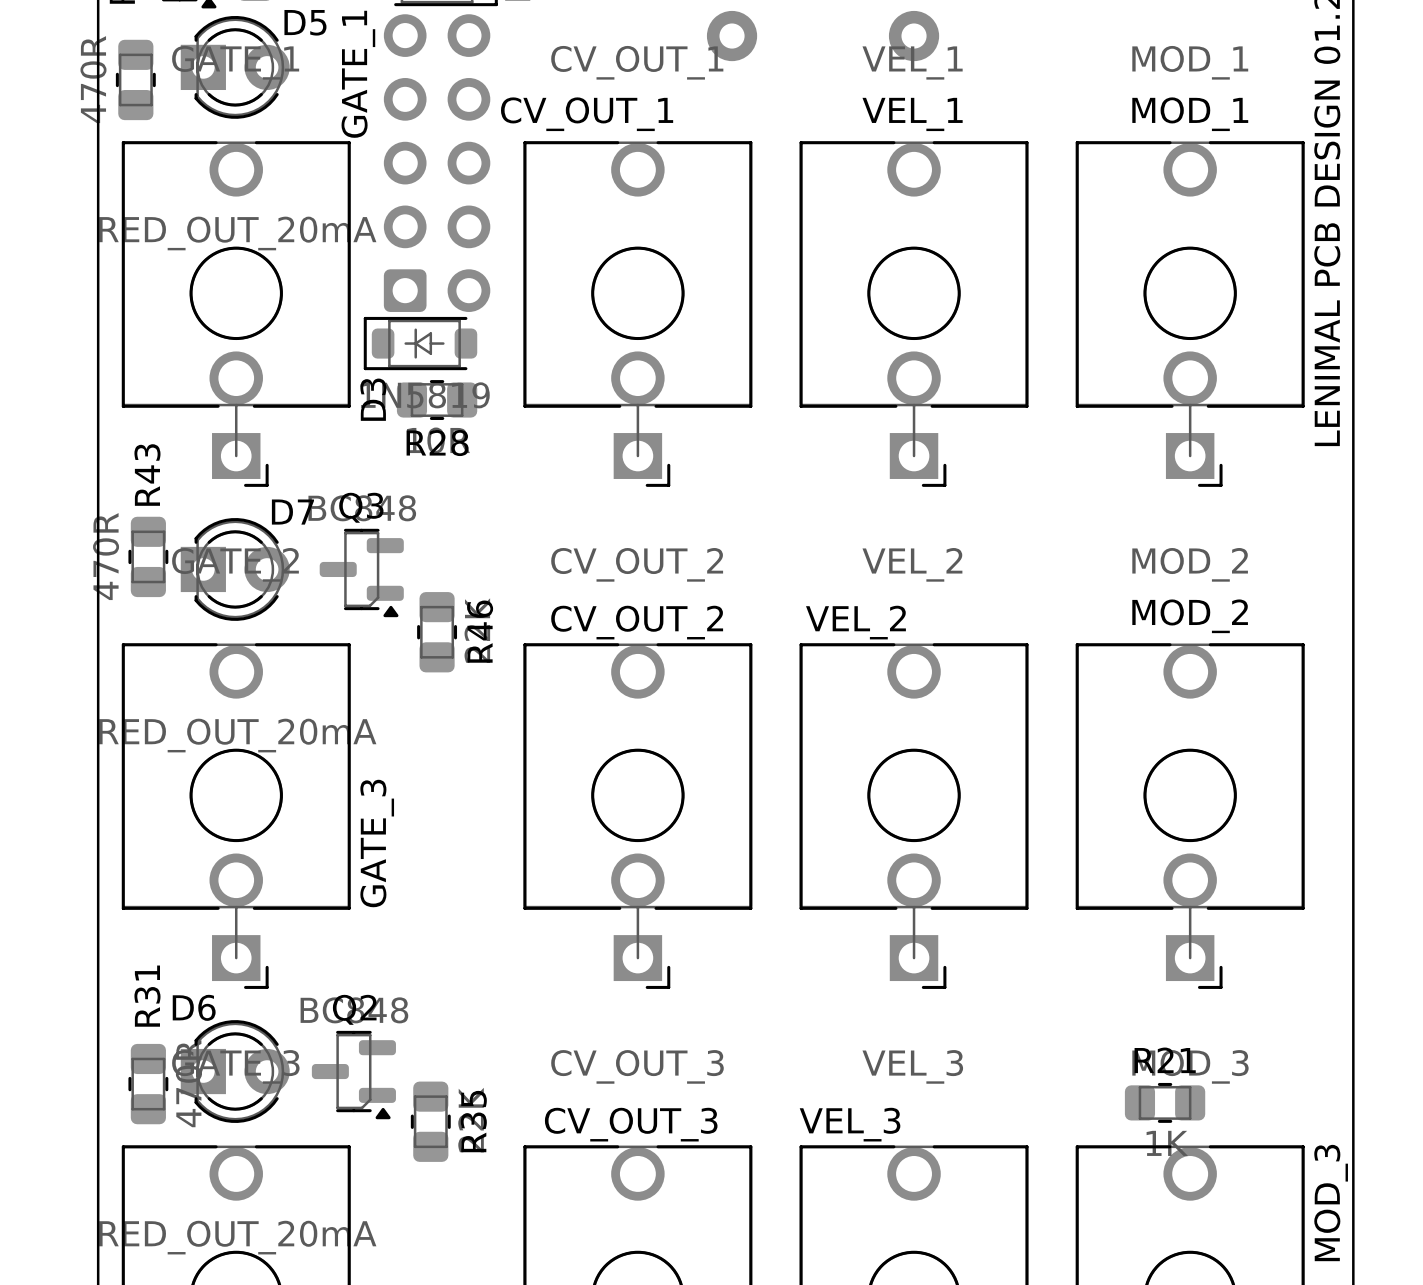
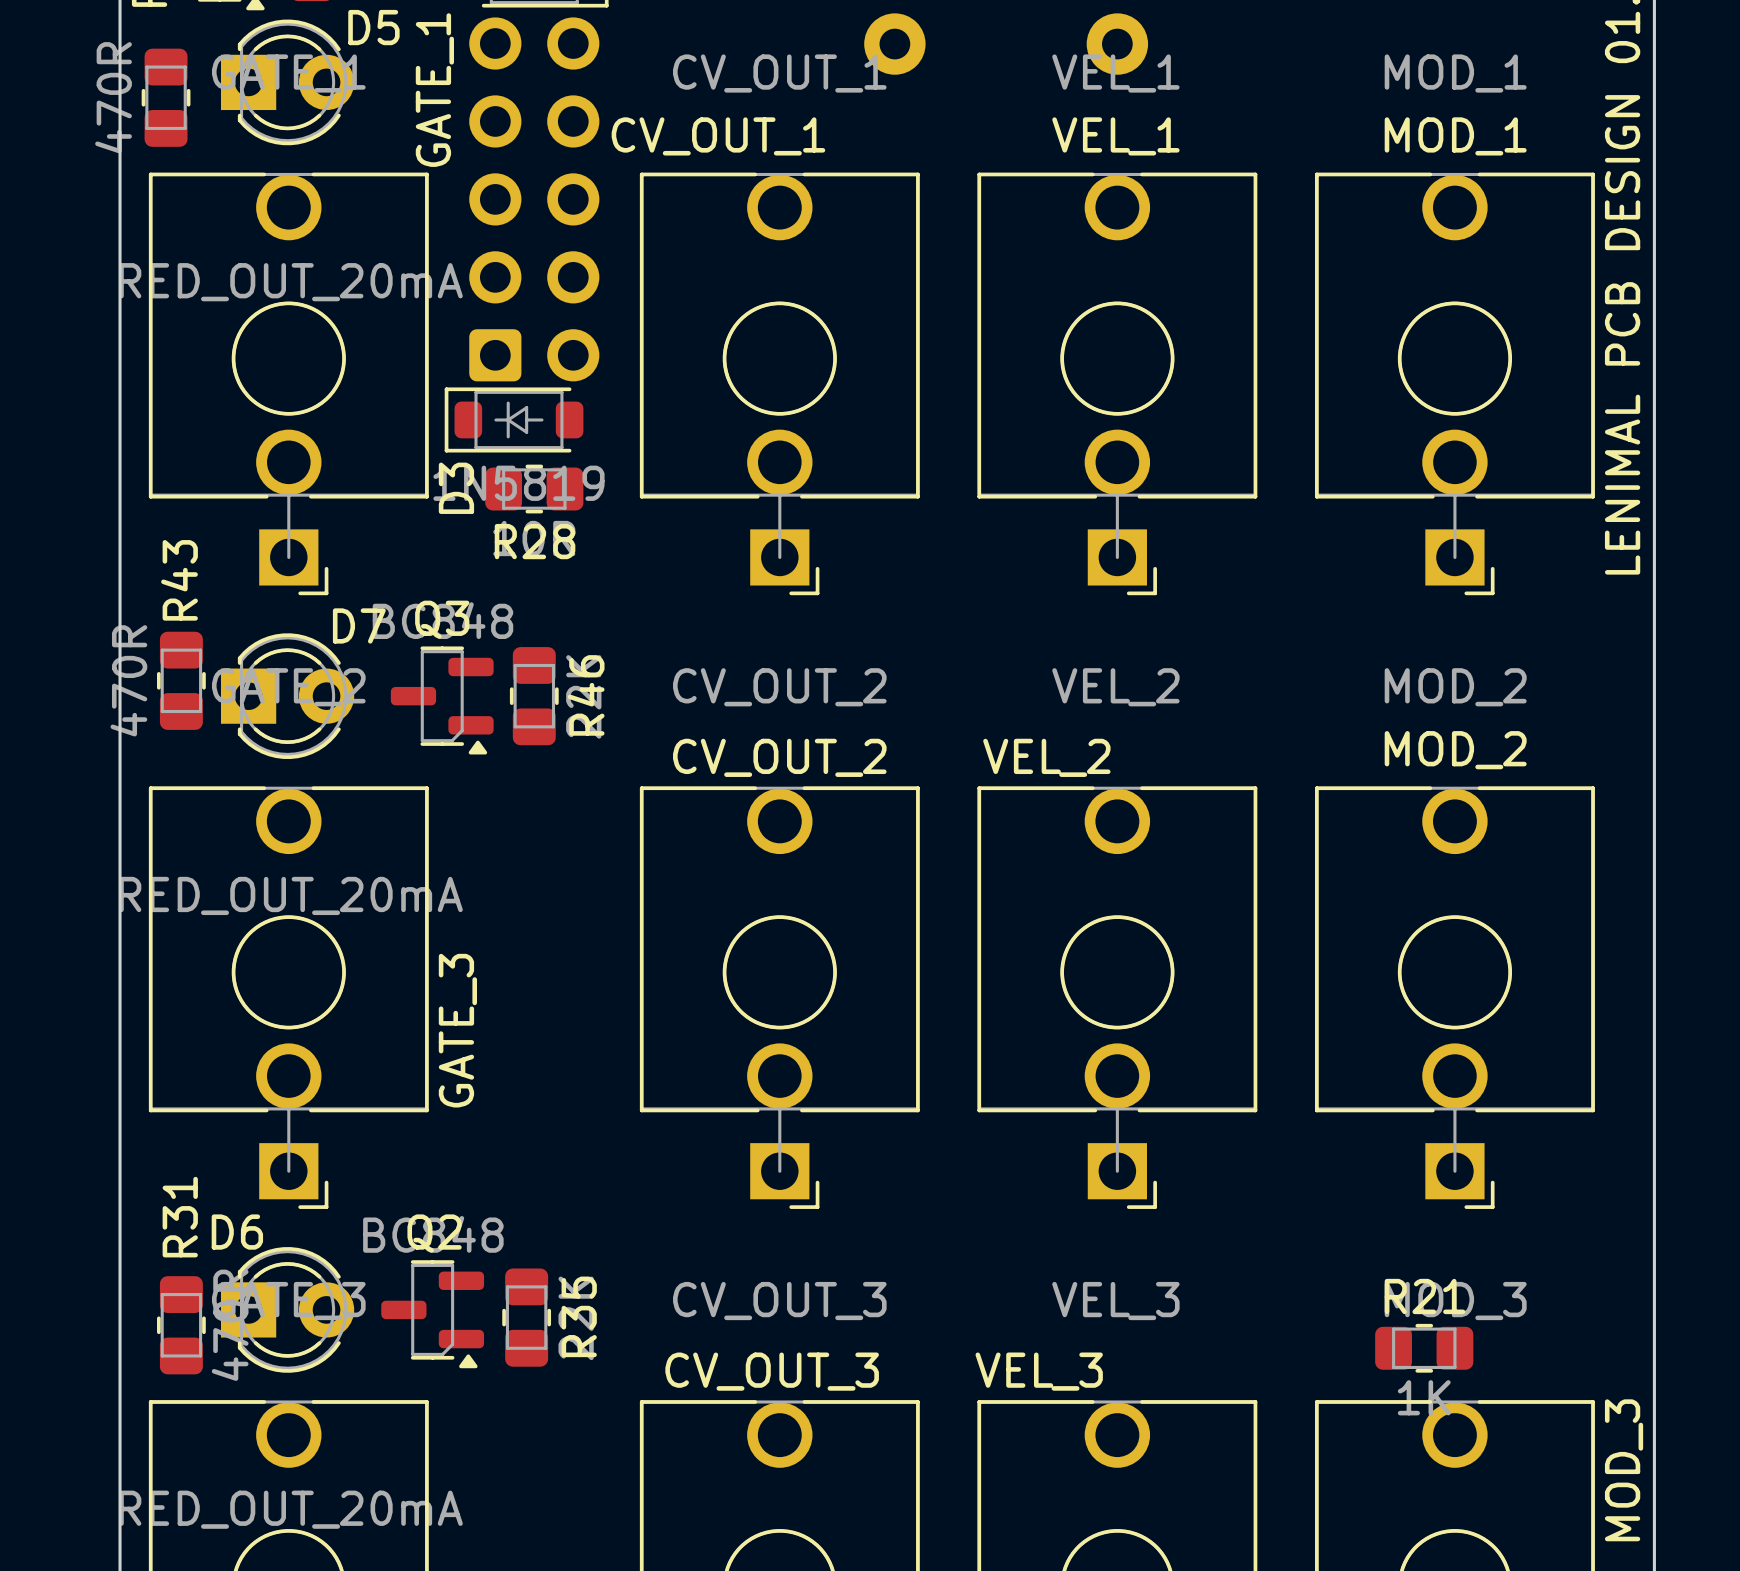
R46 position: (437, 632) -> (534, 696)
R35 position: (430, 1121) -> (526, 1317)

